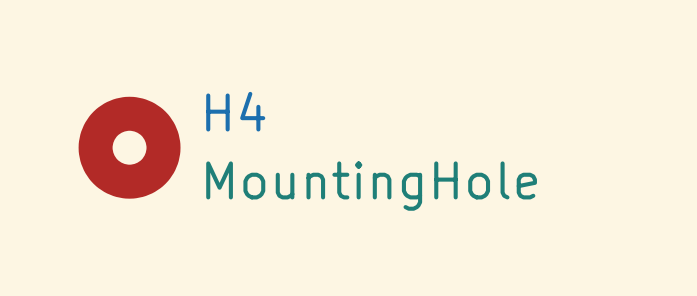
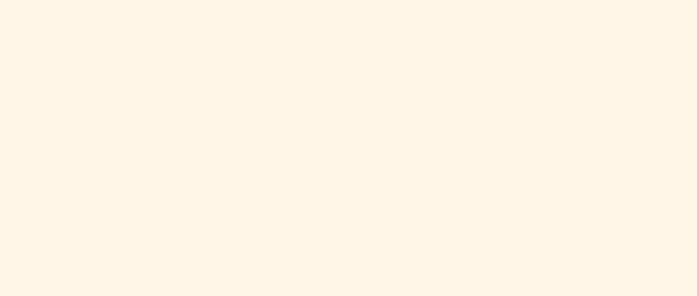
H4: MountingHole (129, 147) -> none

